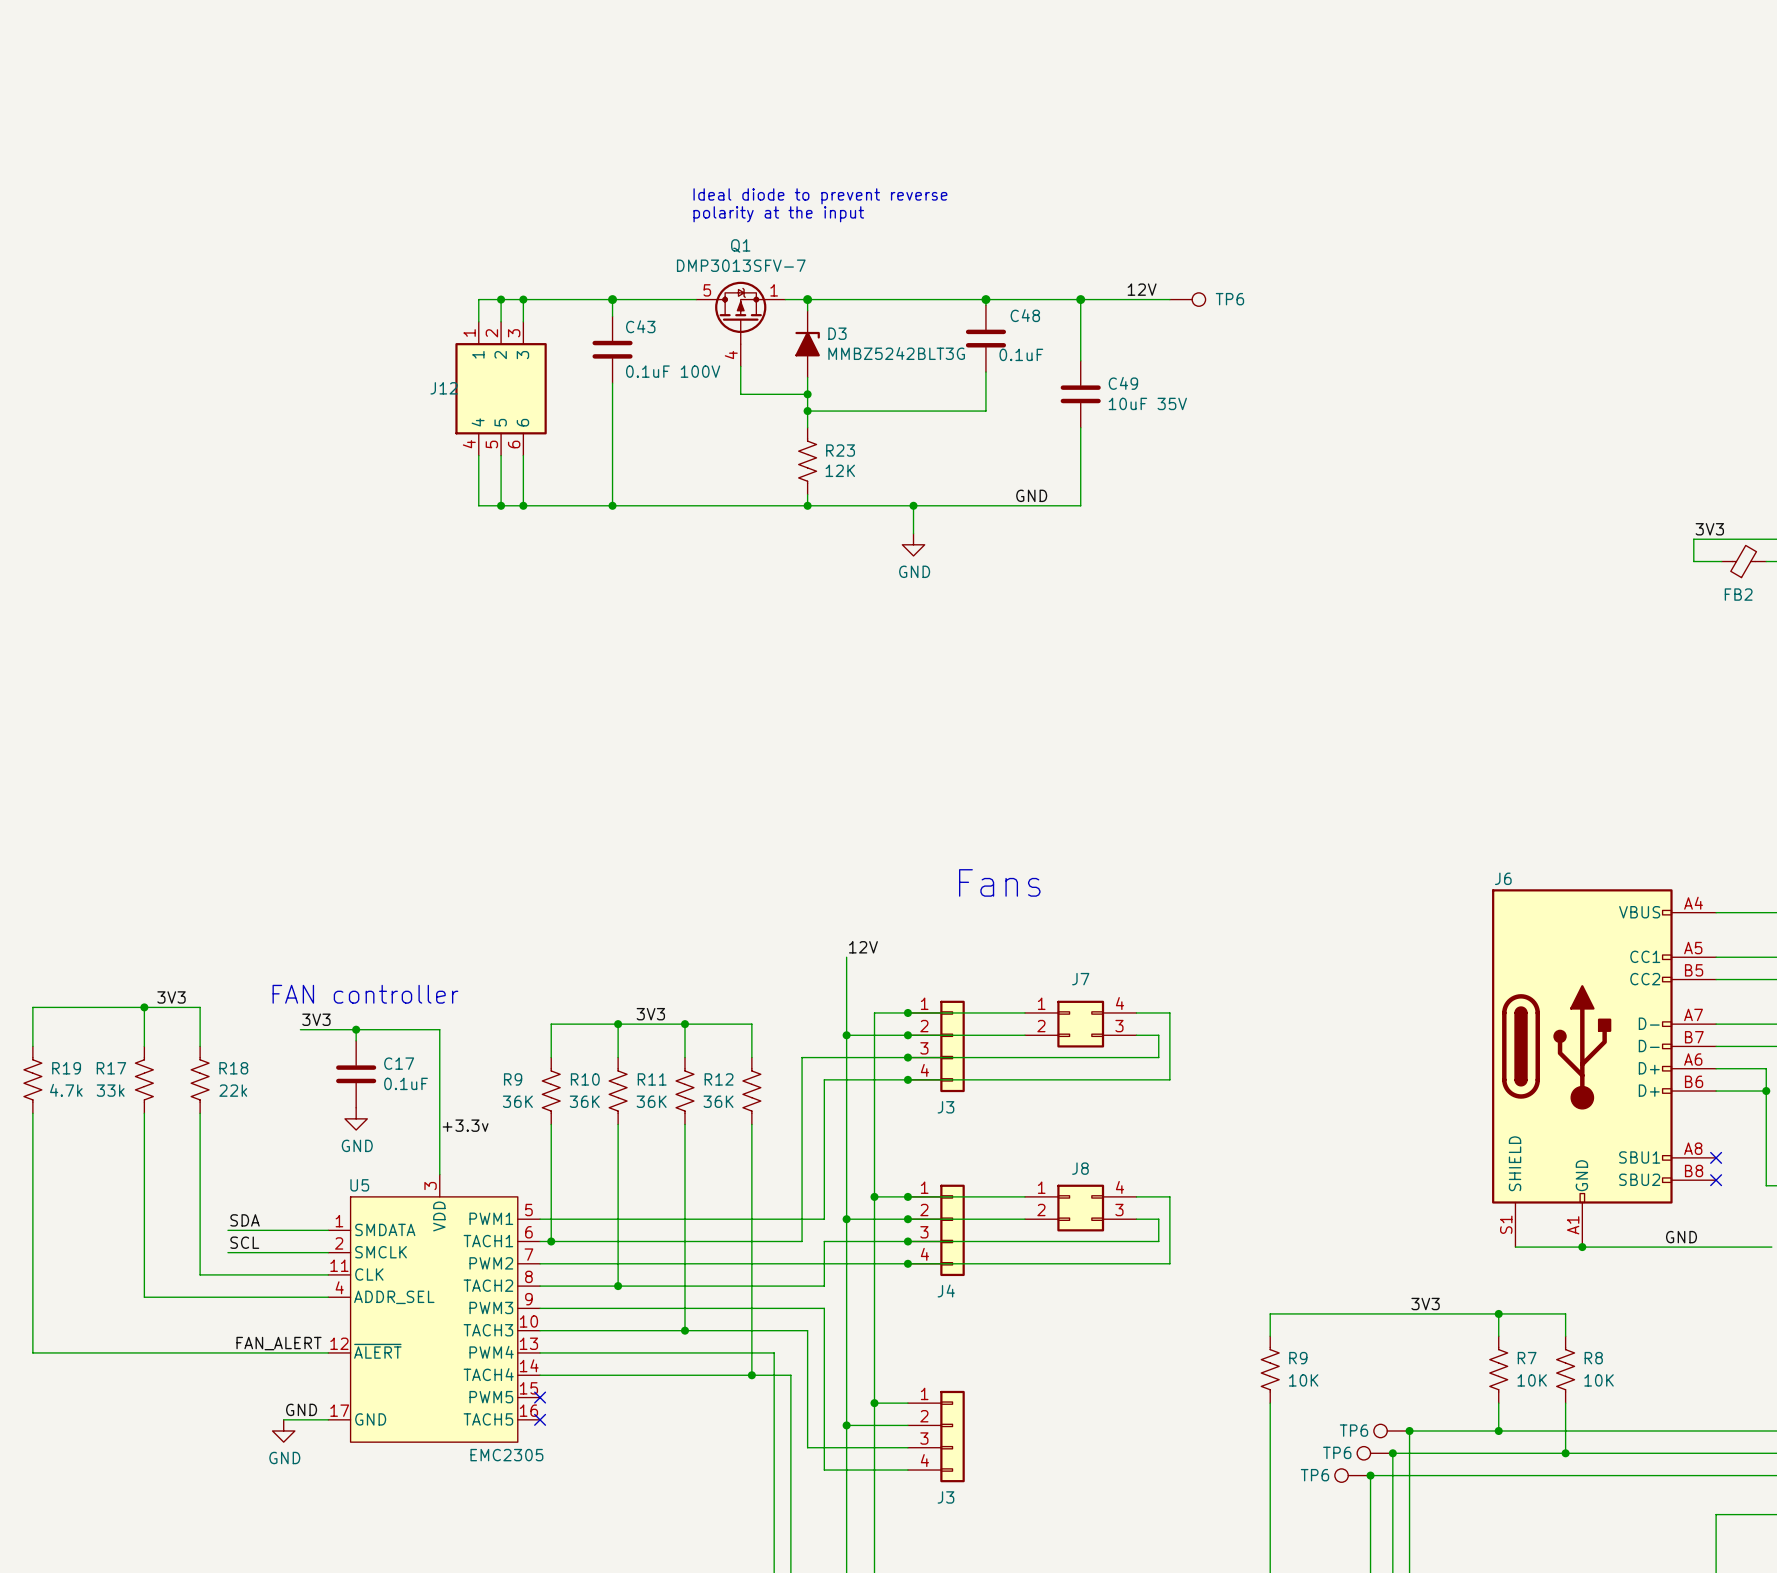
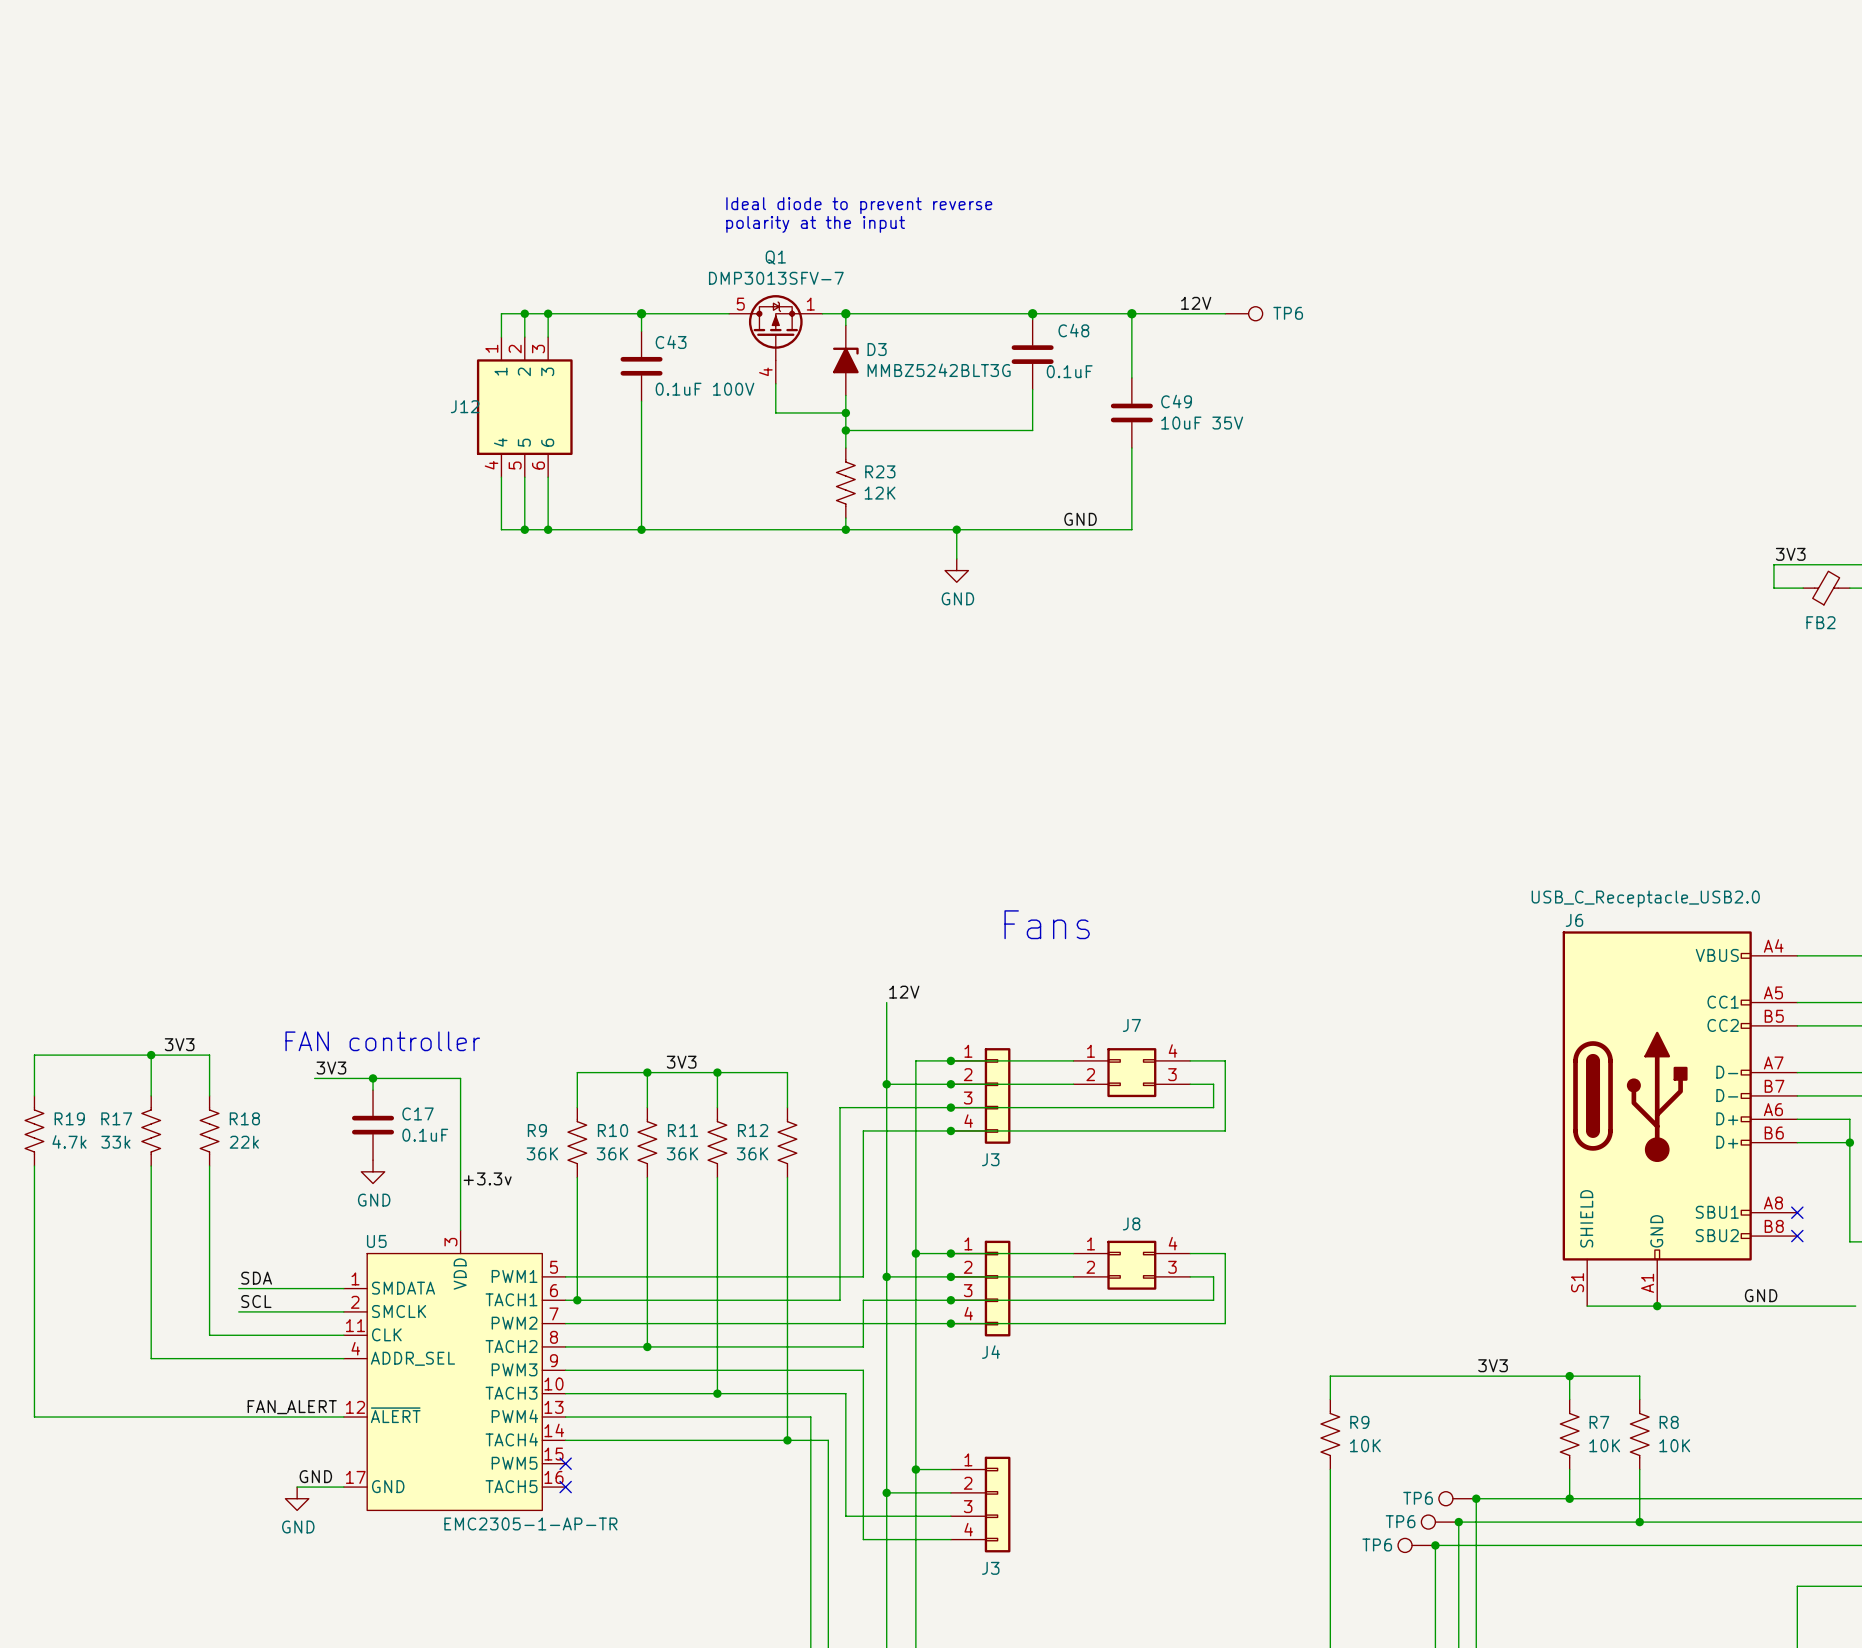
J6 value: none -> USB_C_Receptacle_USB2.0 (1645, 898)
U5 value: EMC2305 (506, 1455) -> EMC2305-1-AP-TR (530, 1523)

